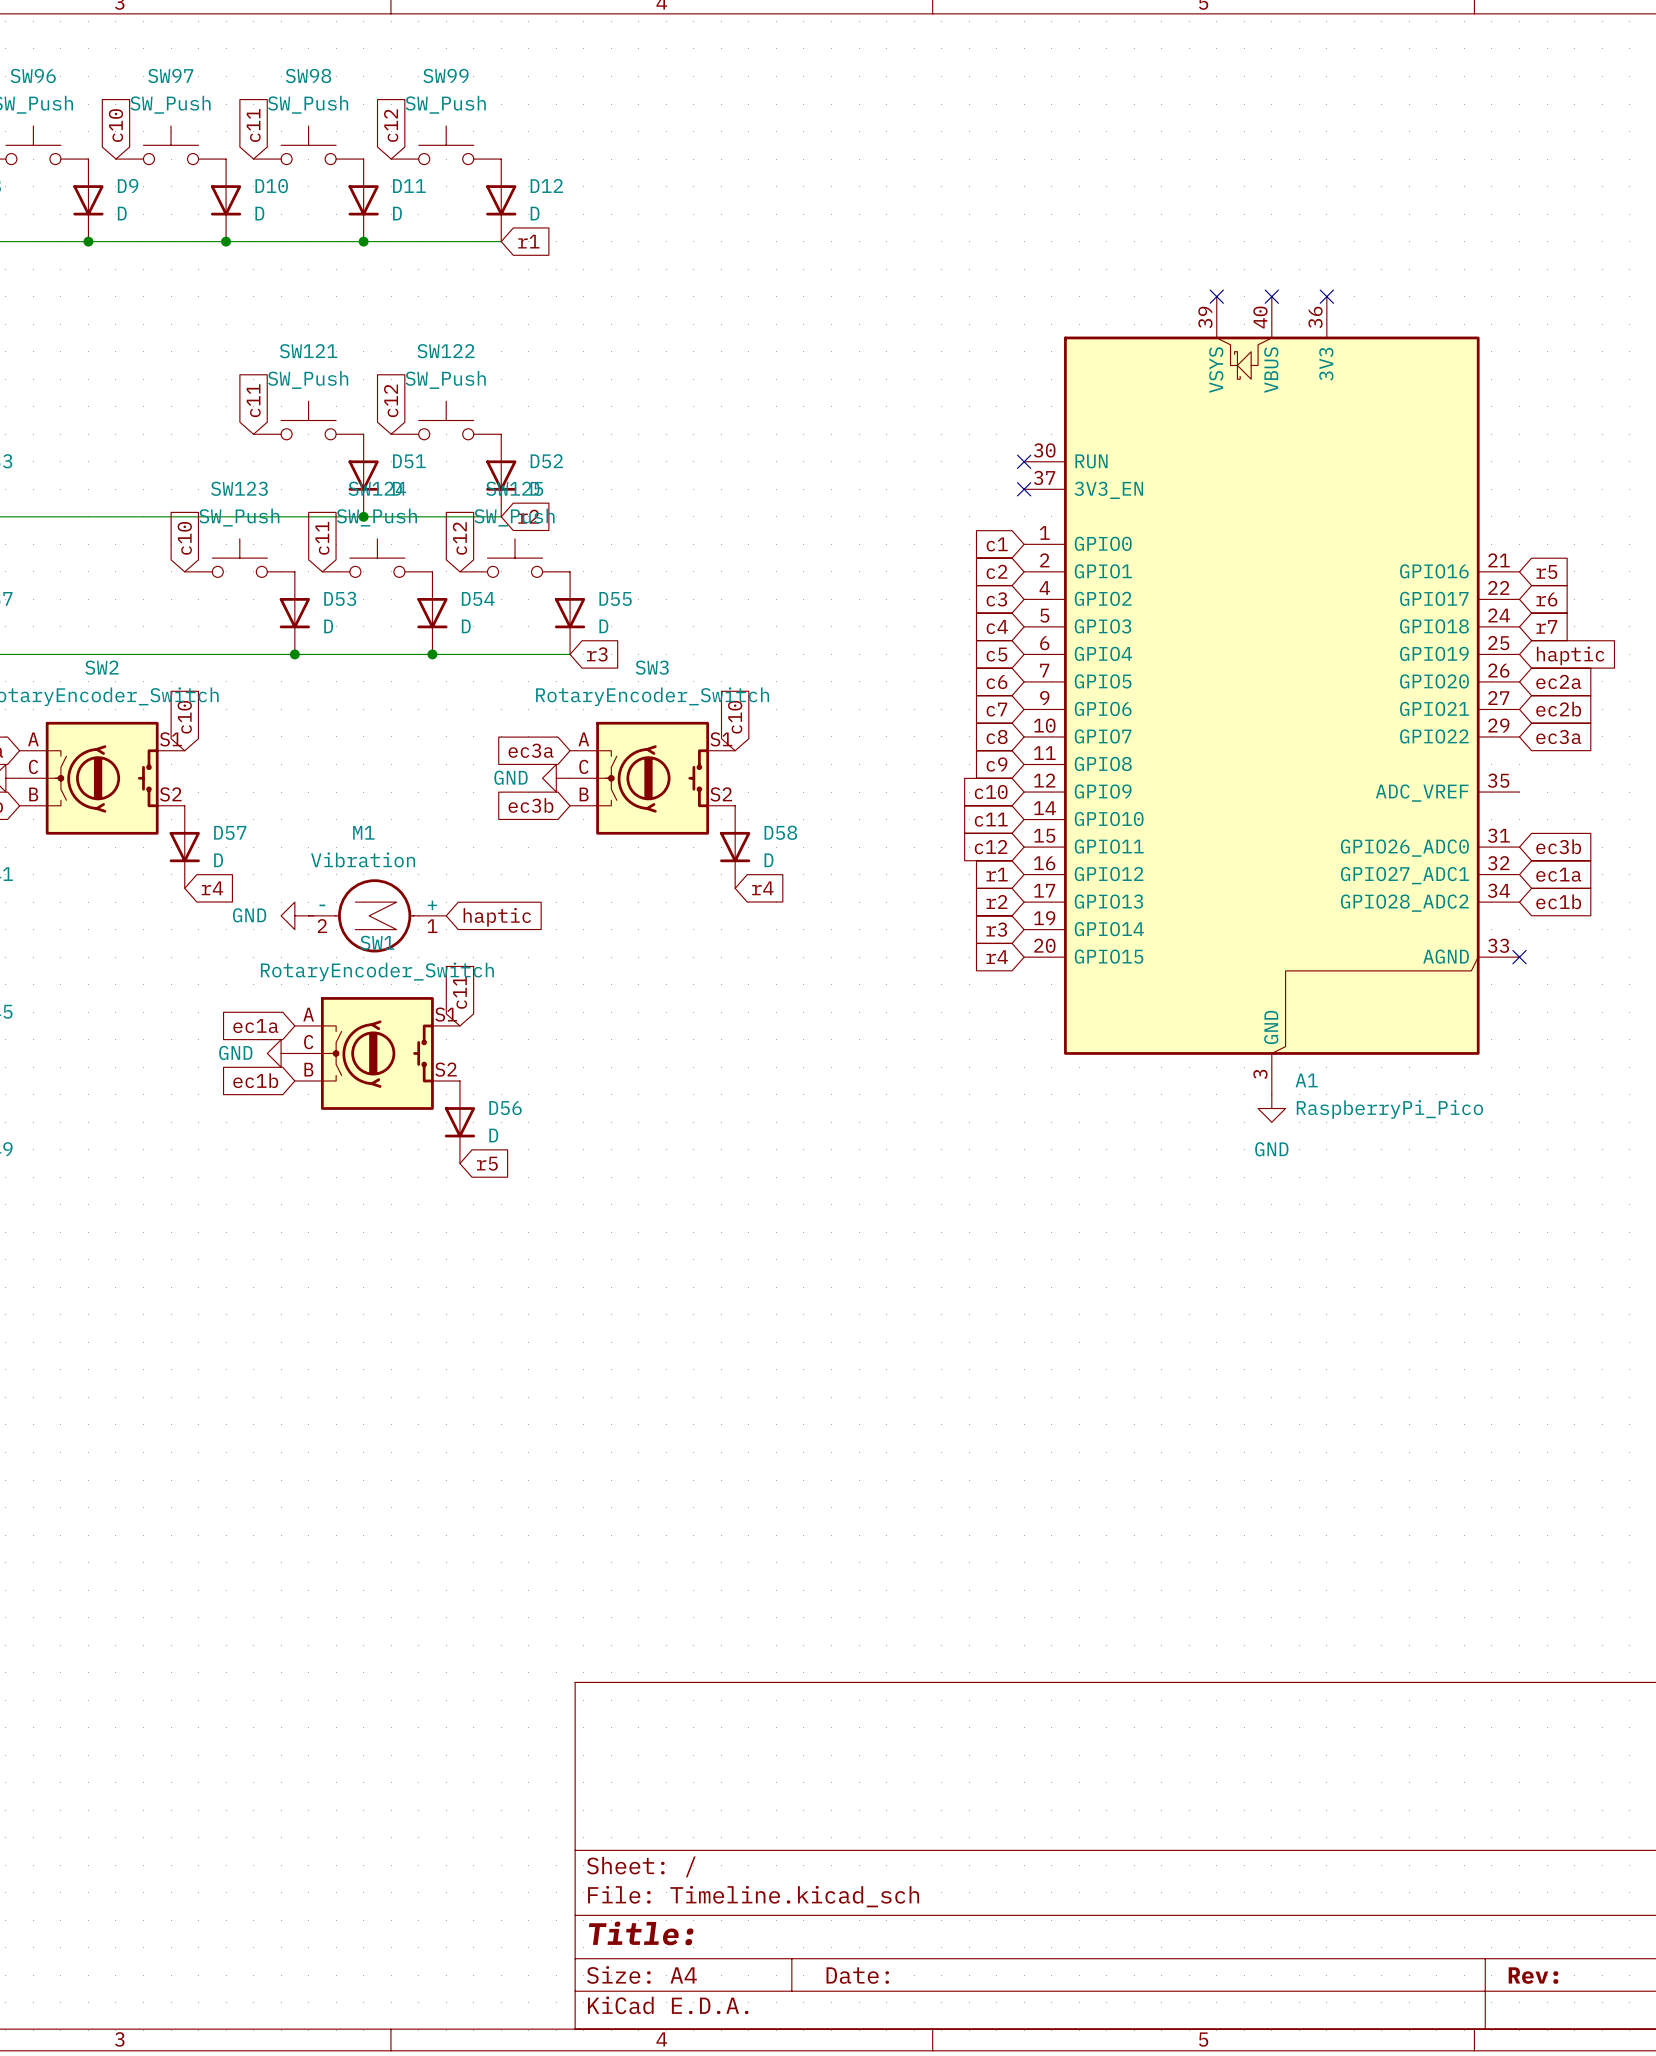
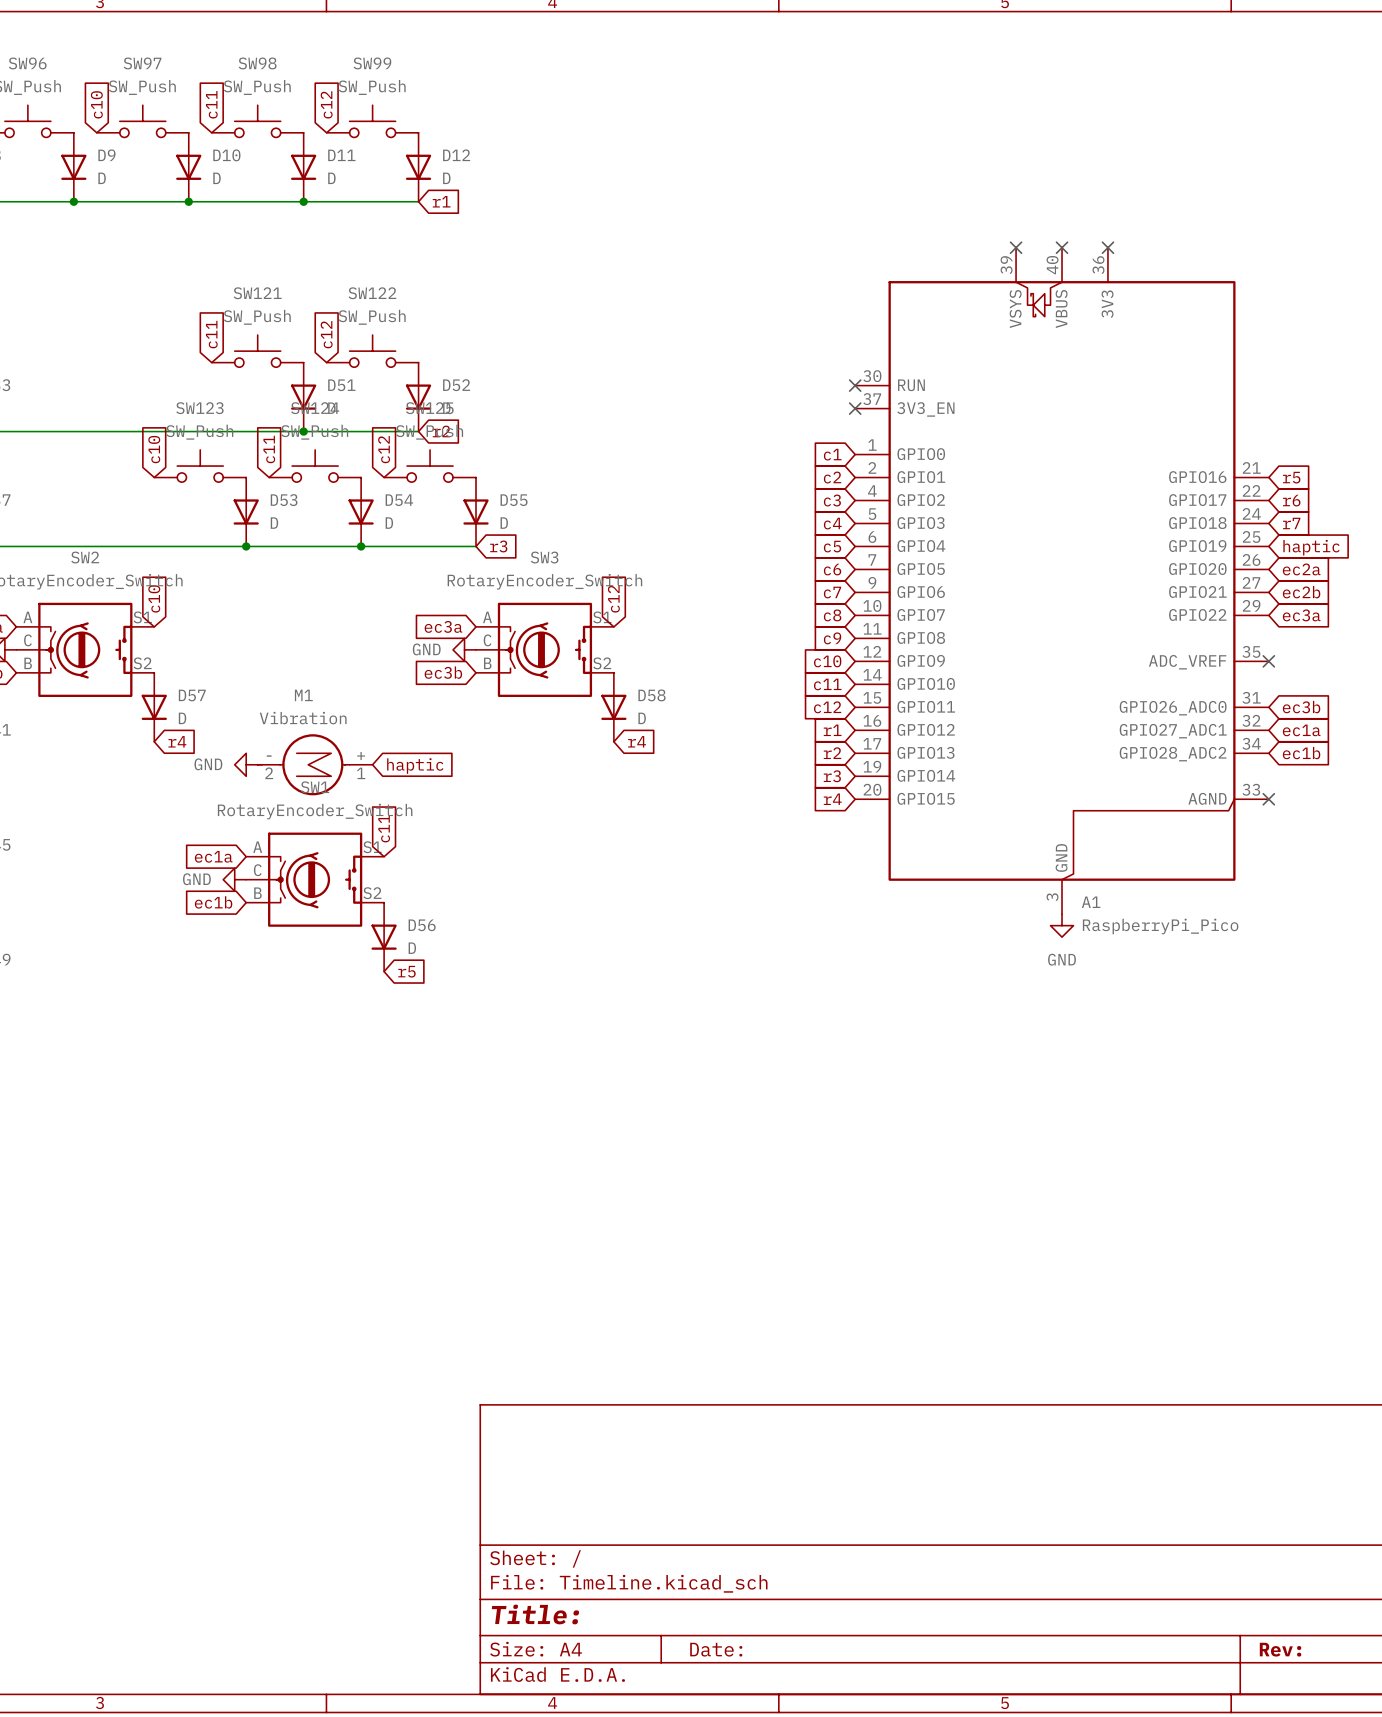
global label: c10 (735, 717) -> c12 (613, 598)
no-connect mark: none -> (1268, 661)

